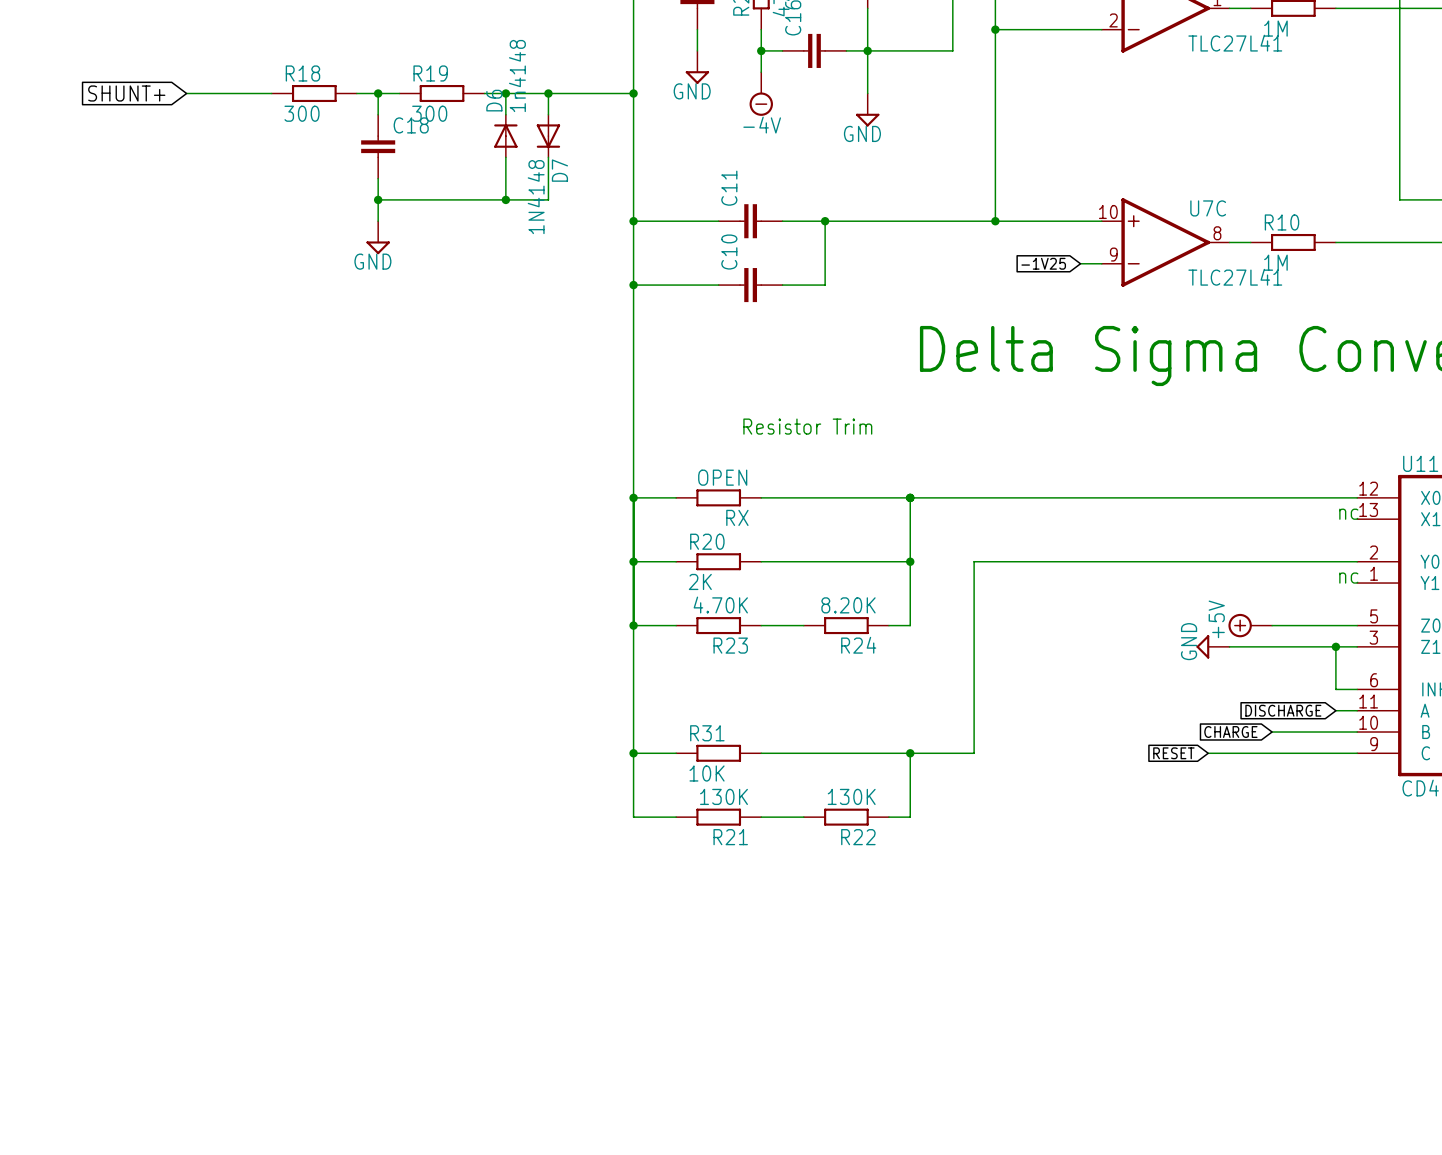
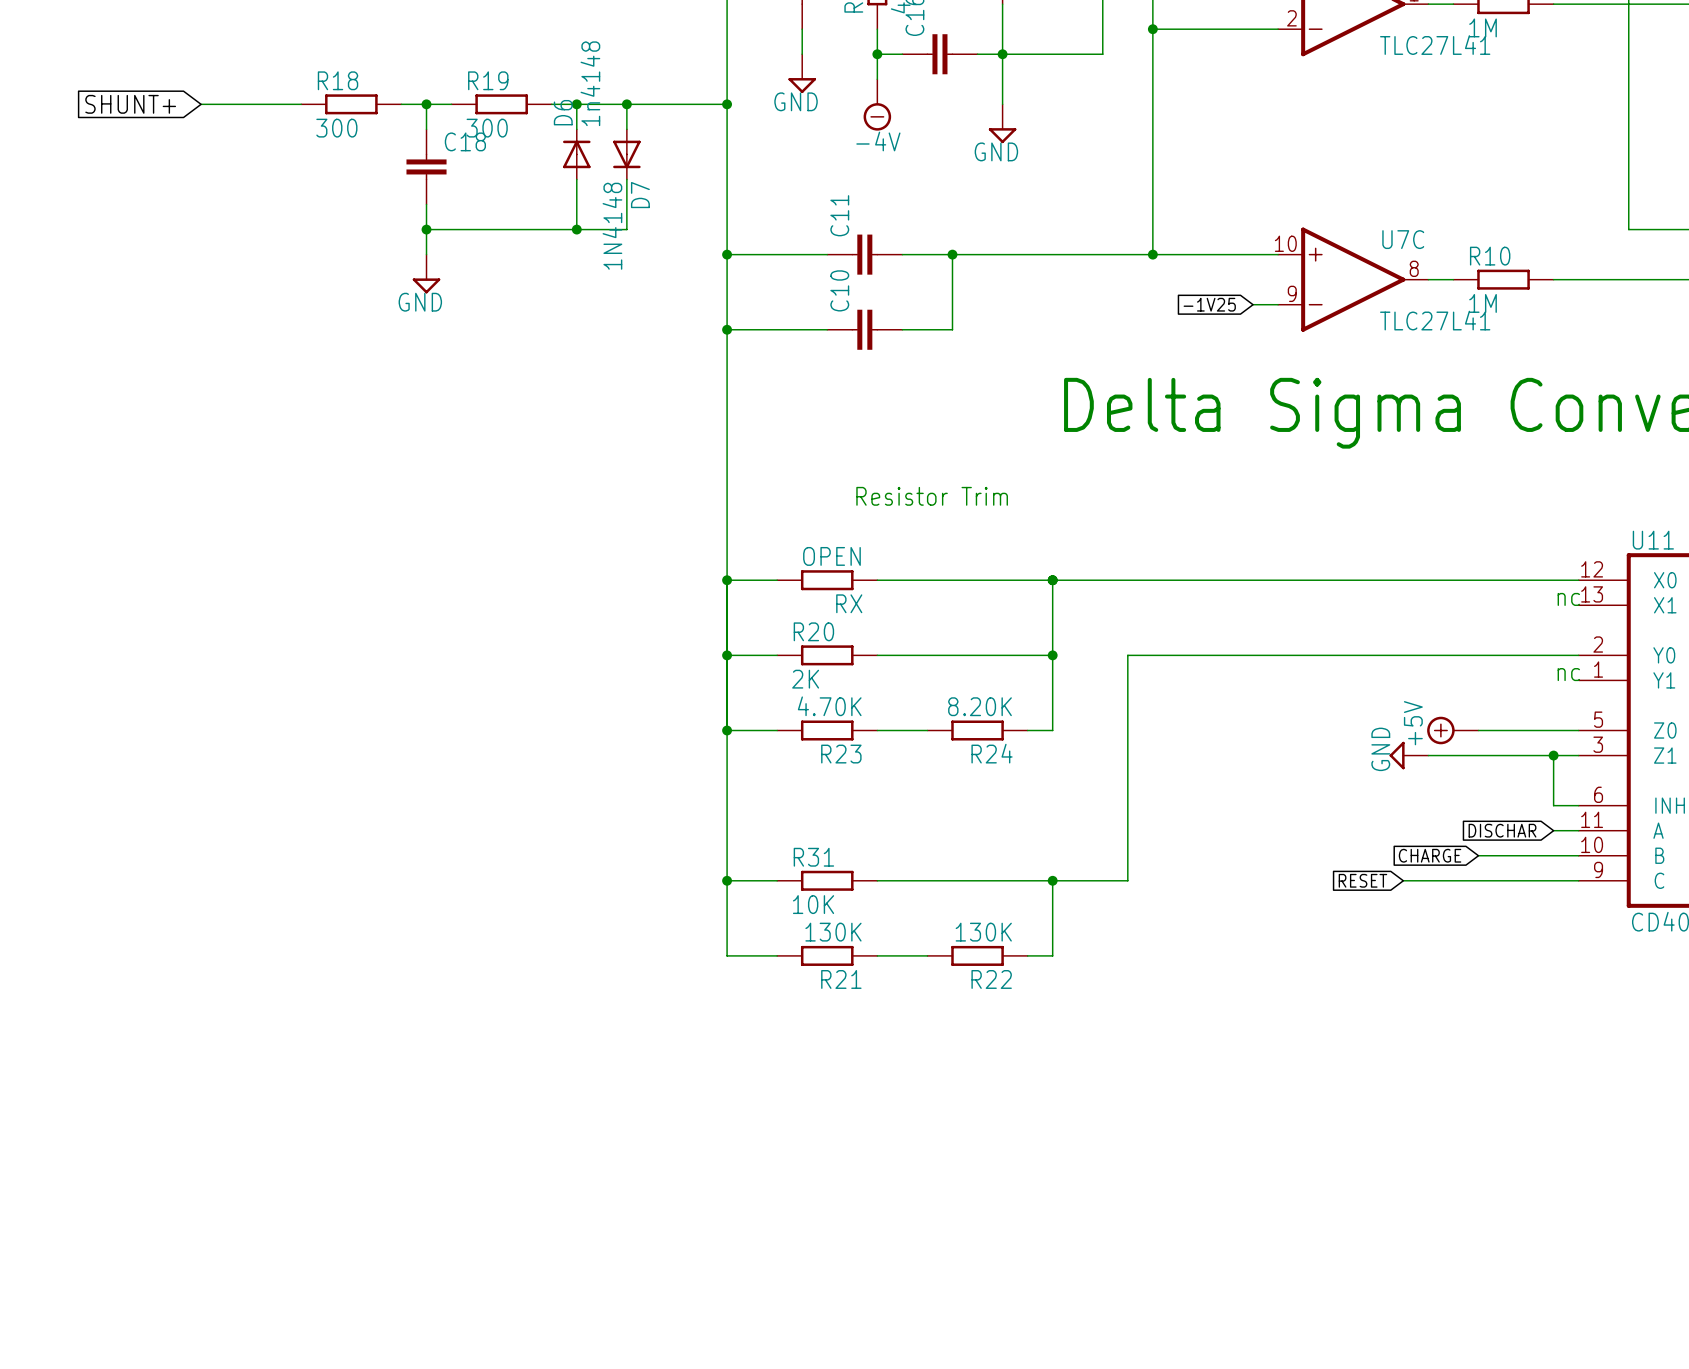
global label: DISCHARGE (1283, 710) -> DISCHAR (1502, 830)

